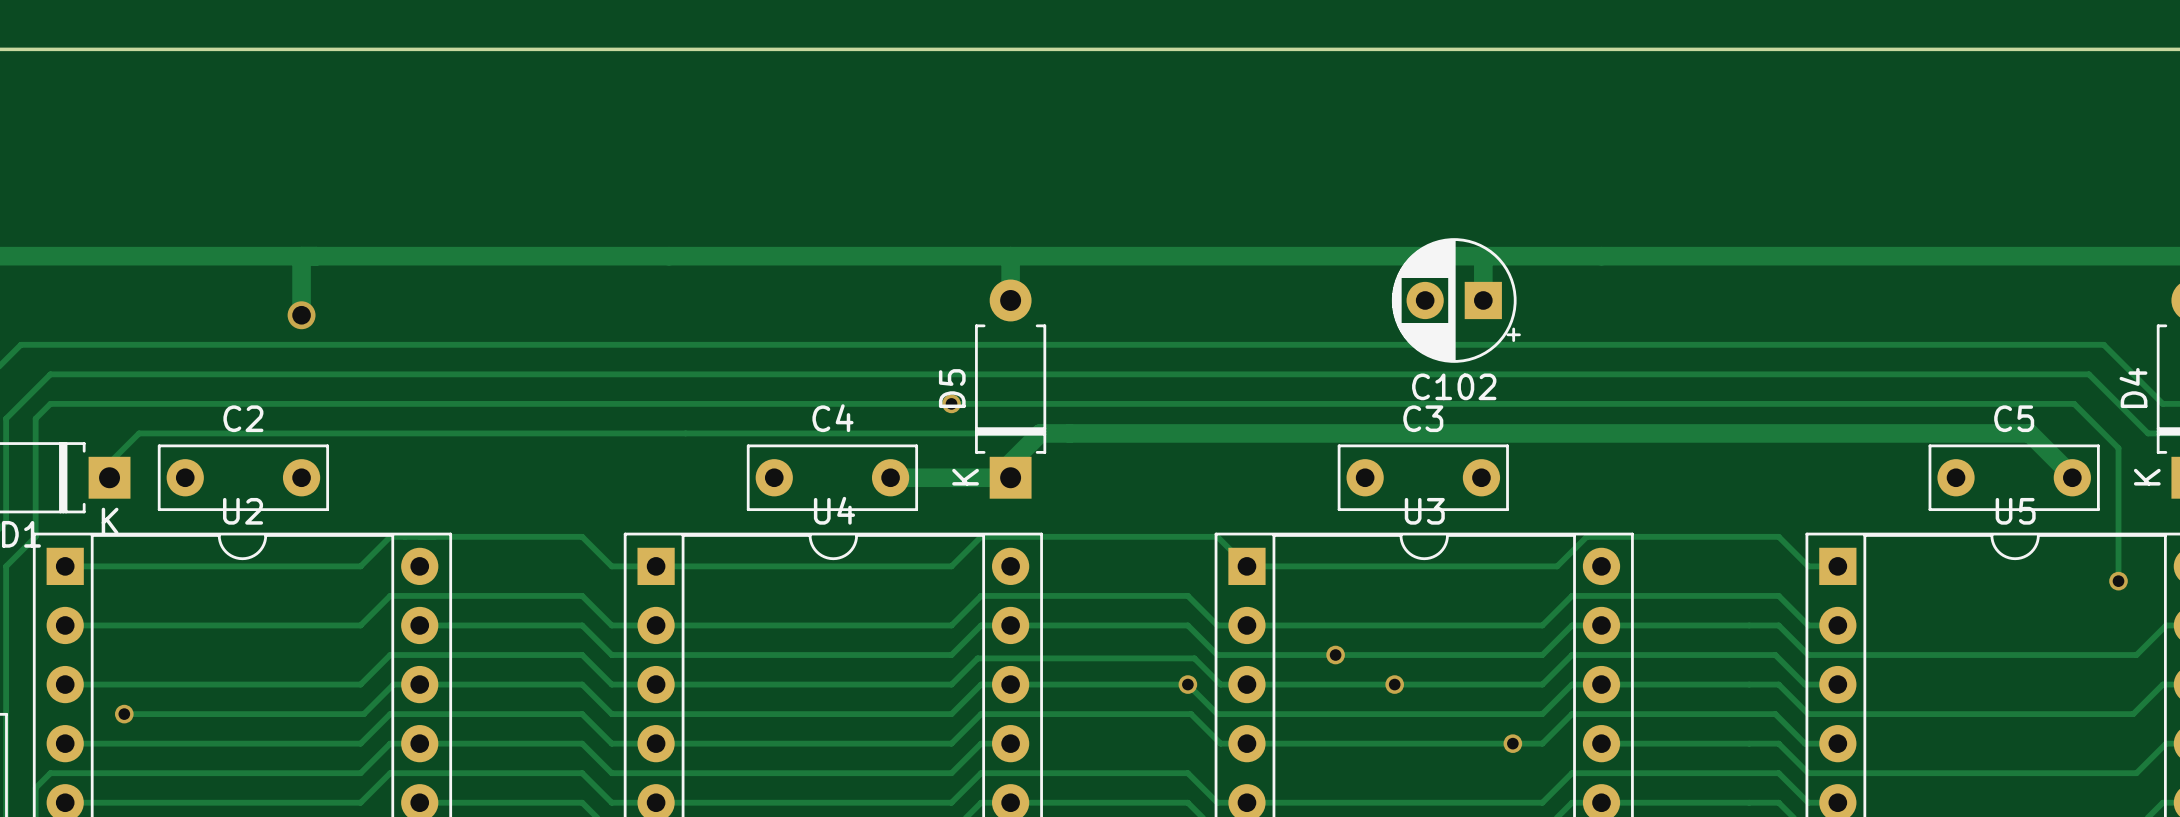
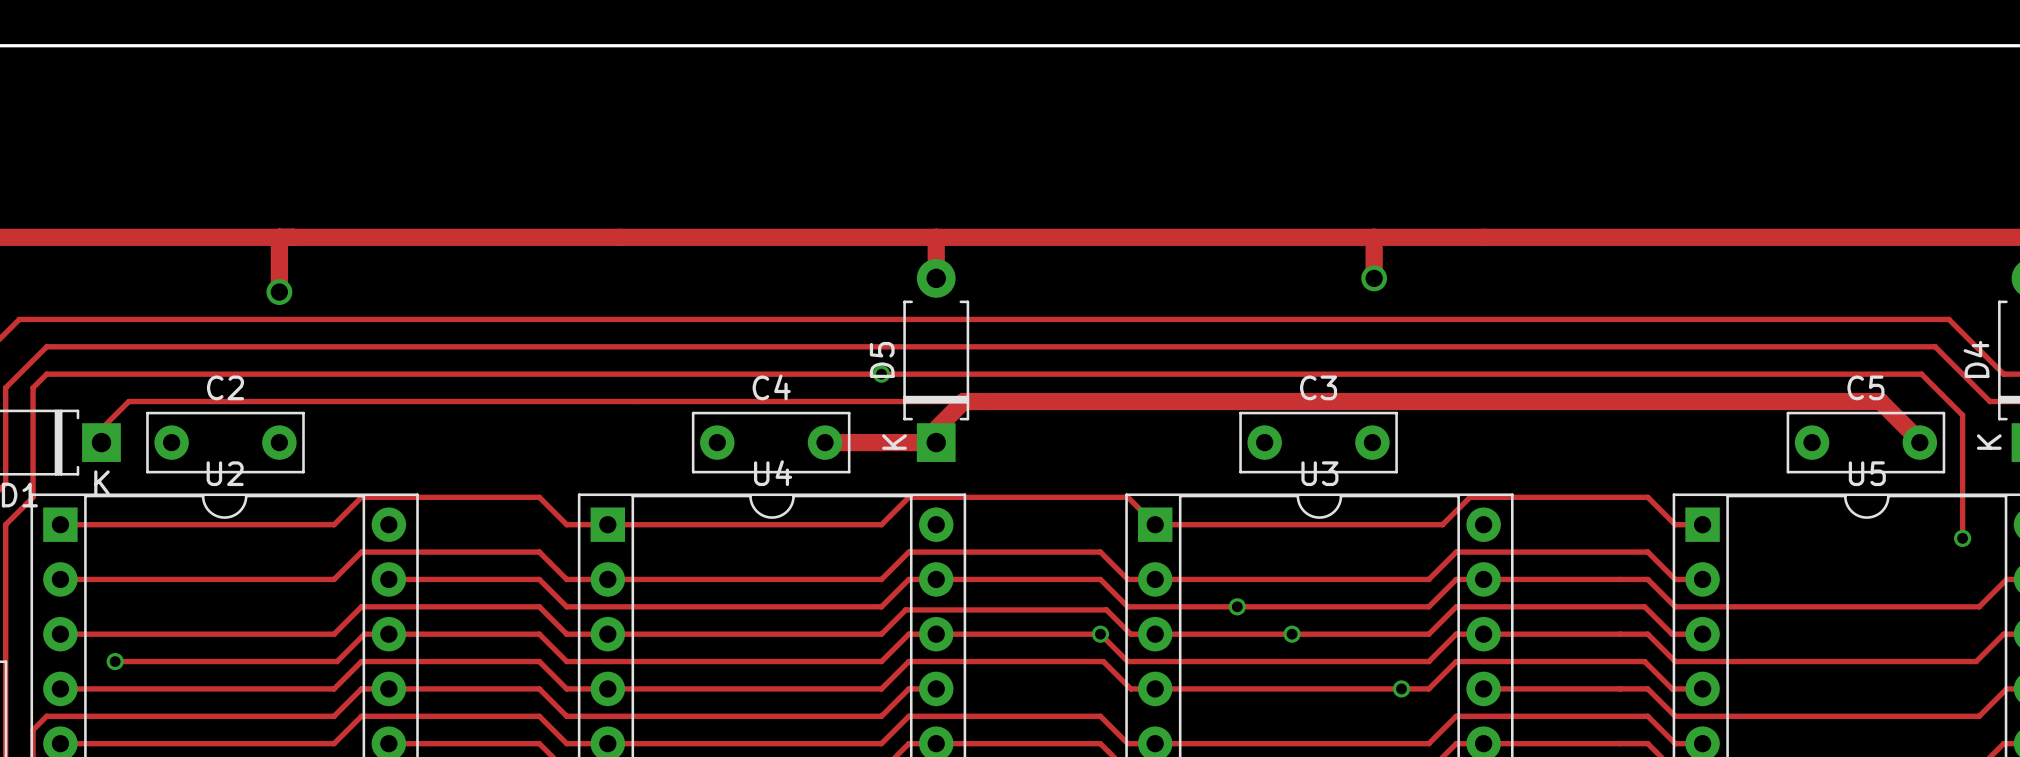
C102: (1456, 300) -> none
via: none -> (1374, 278)

